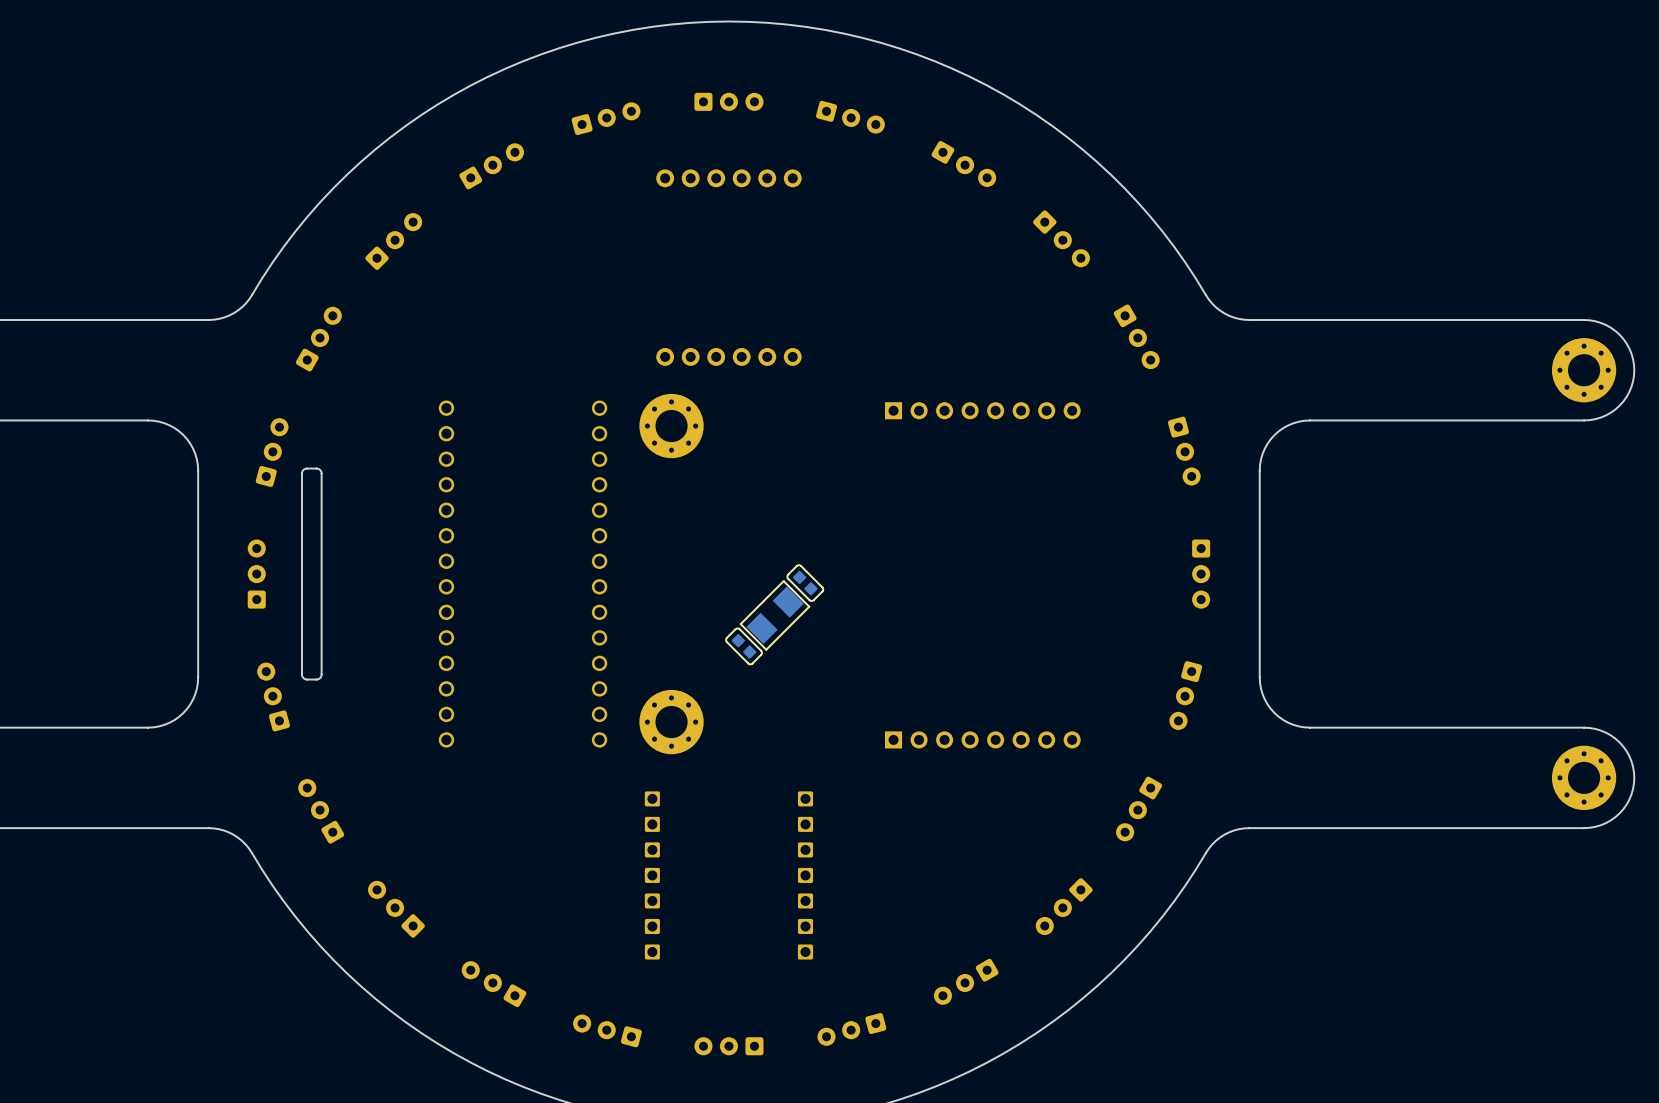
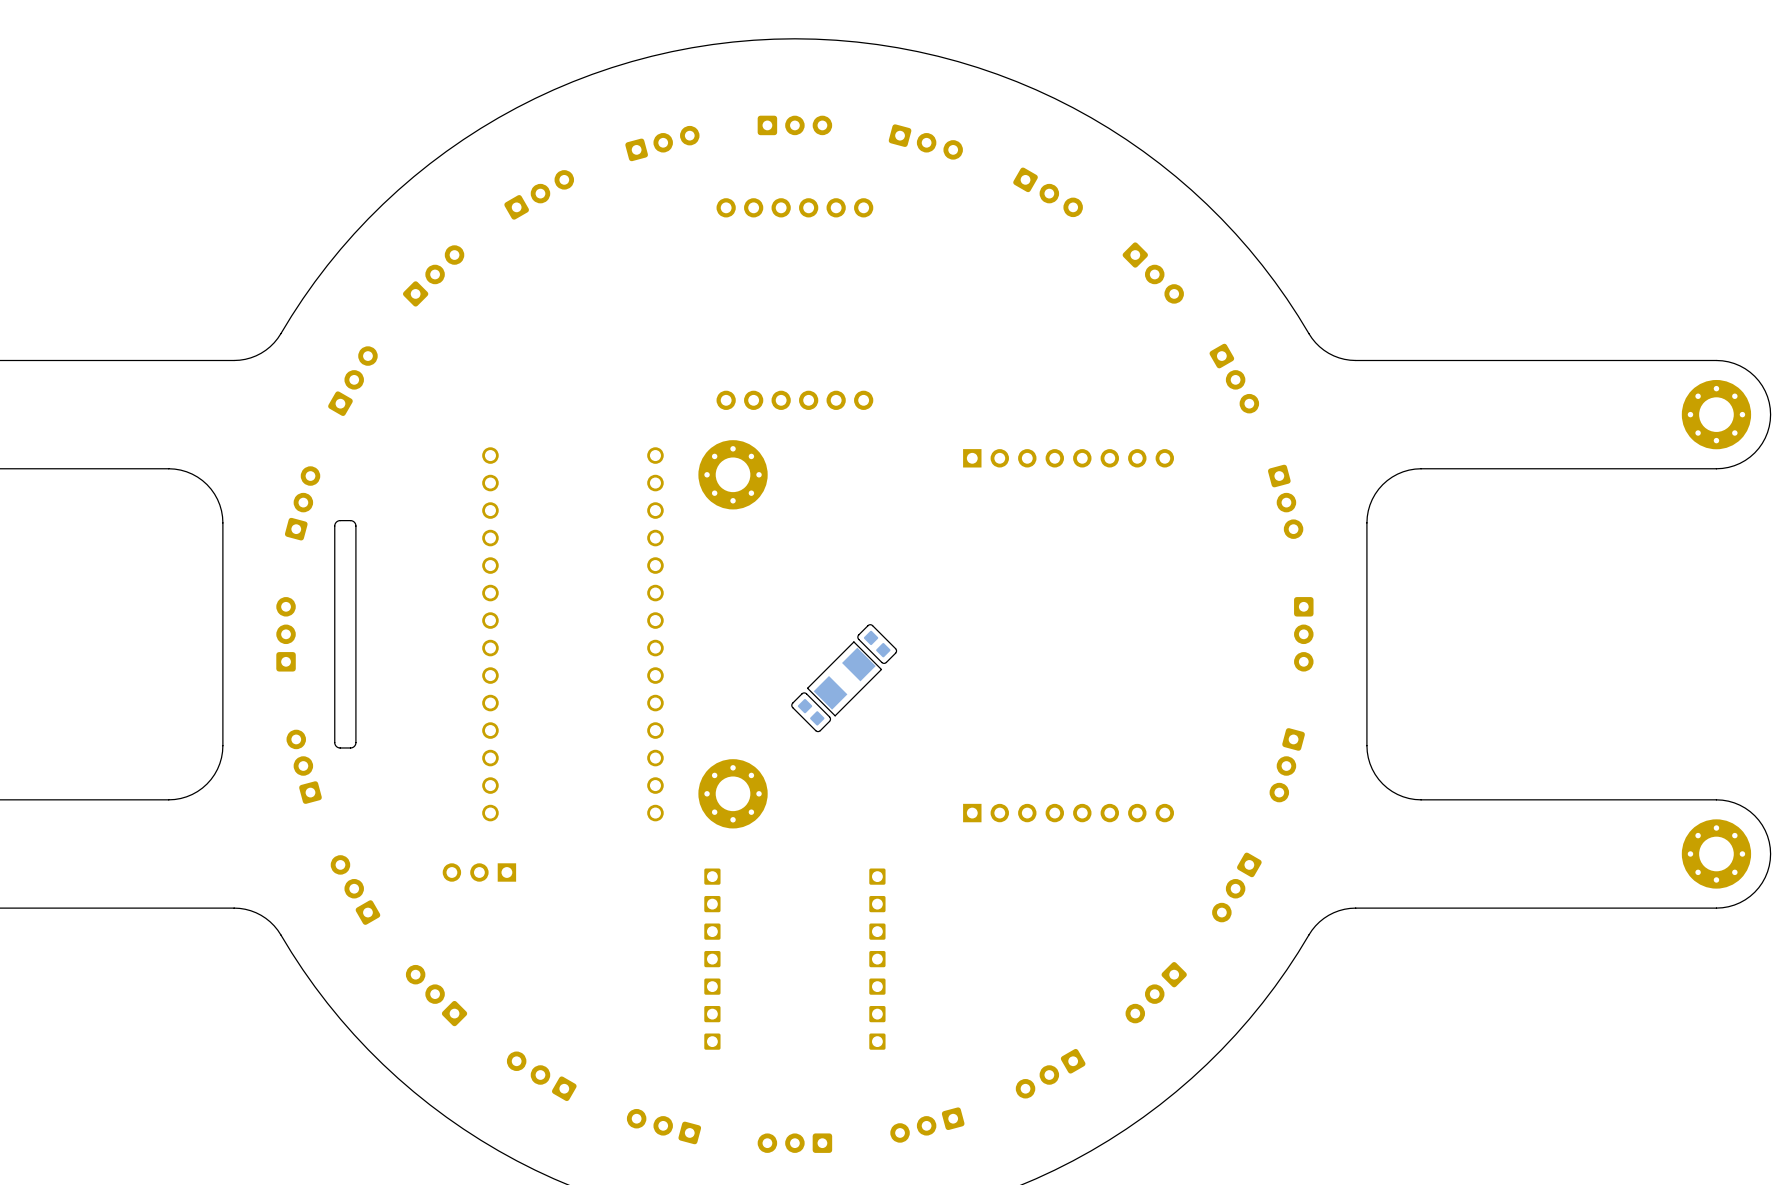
part: none -> (479, 872)

